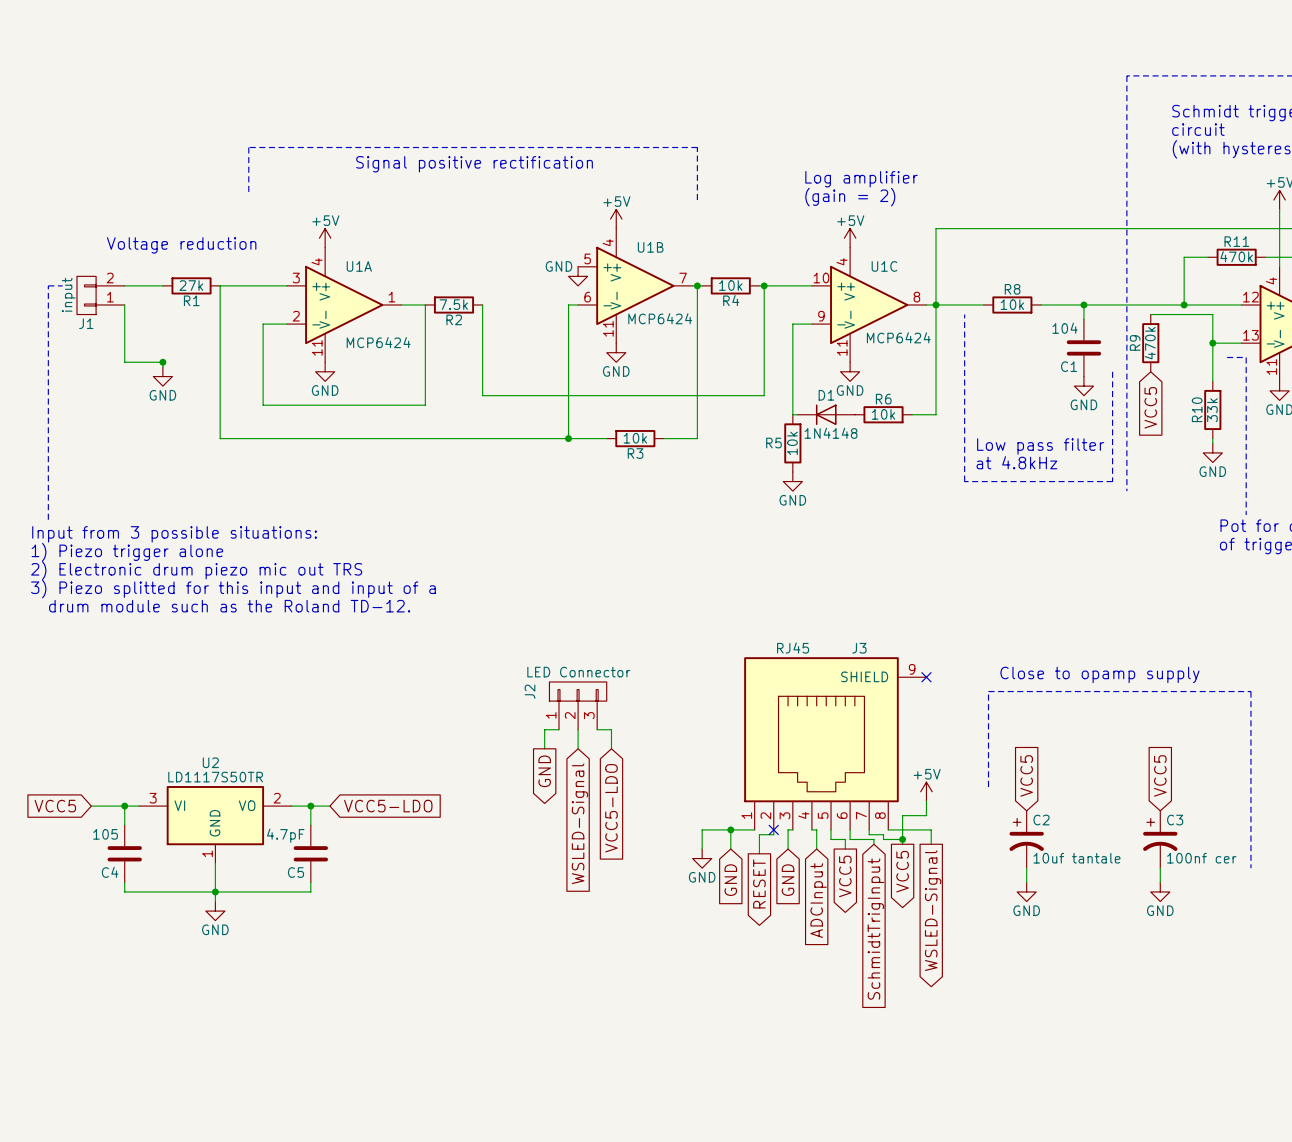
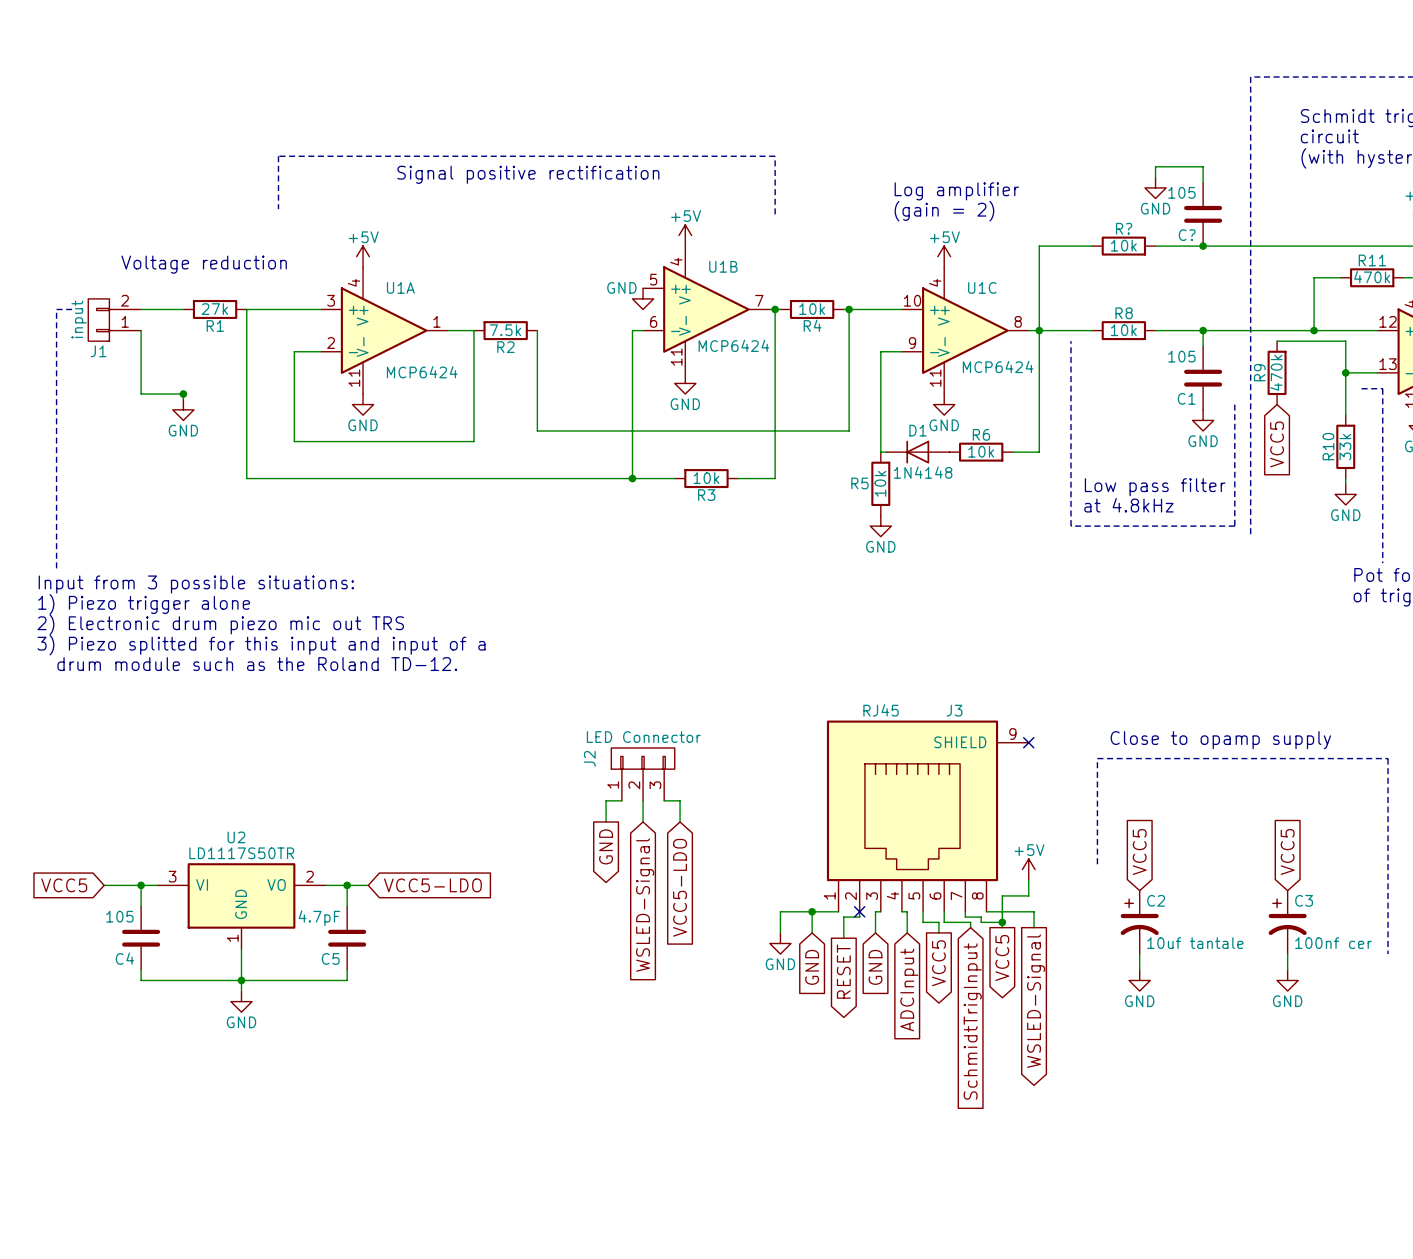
wire: none -> (1155, 177) (1155, 166) (1203, 166) (1203, 182)
power symbol: none -> GND (1155, 187)
C?: none -> 105 (1203, 214)
wire: (983, 228) (1040, 228) -> none
R?: none -> 10k (1123, 246)
junction: none -> (1203, 246)
C1 value: 104 (1065, 328) -> 105 (1181, 356)

